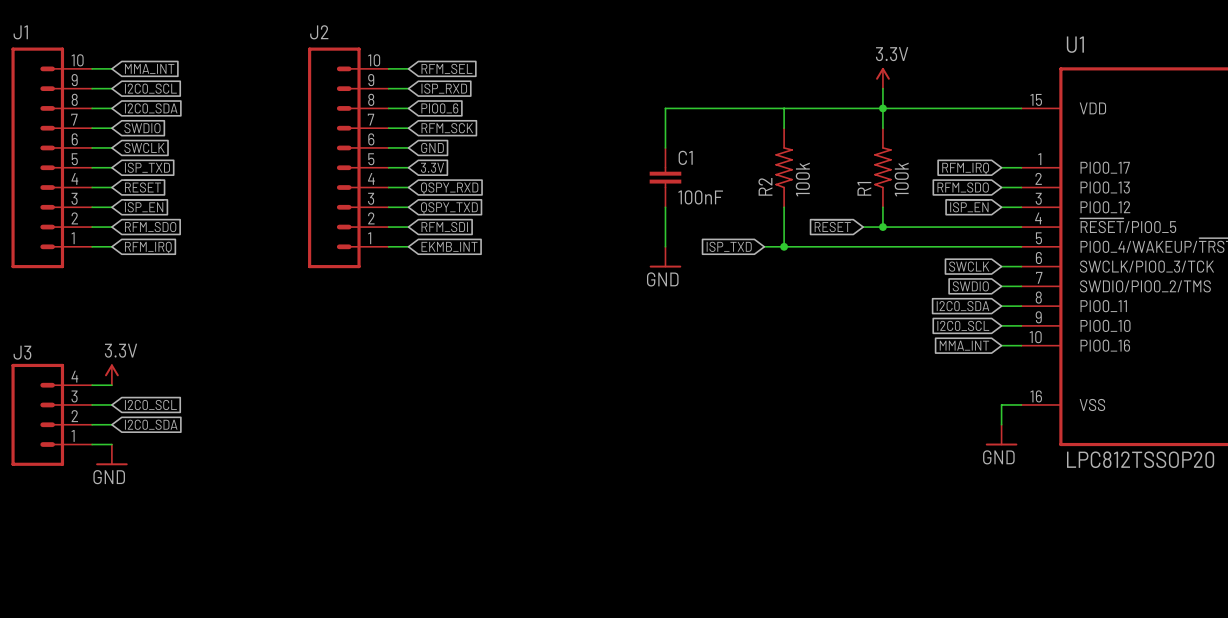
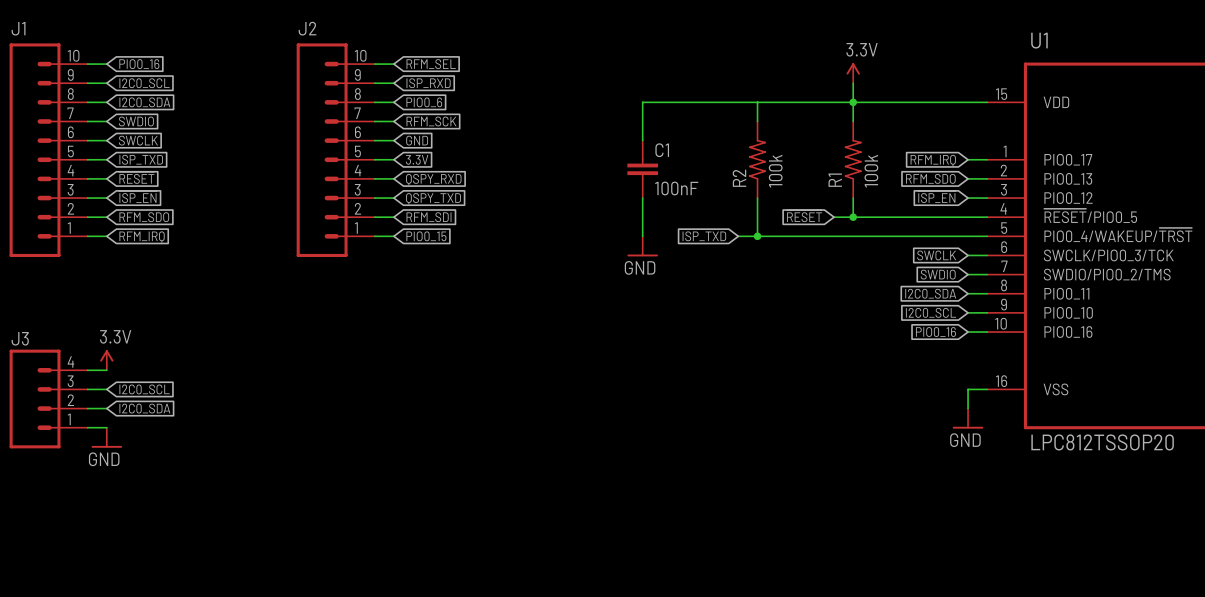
global label: MMA_INT (149, 68) -> PIO0_16 (139, 64)
global label: EKMB_INT (449, 246) -> PIO0_15 (426, 236)
global label: MMA_INT (964, 345) -> PIO0_16 (935, 332)

